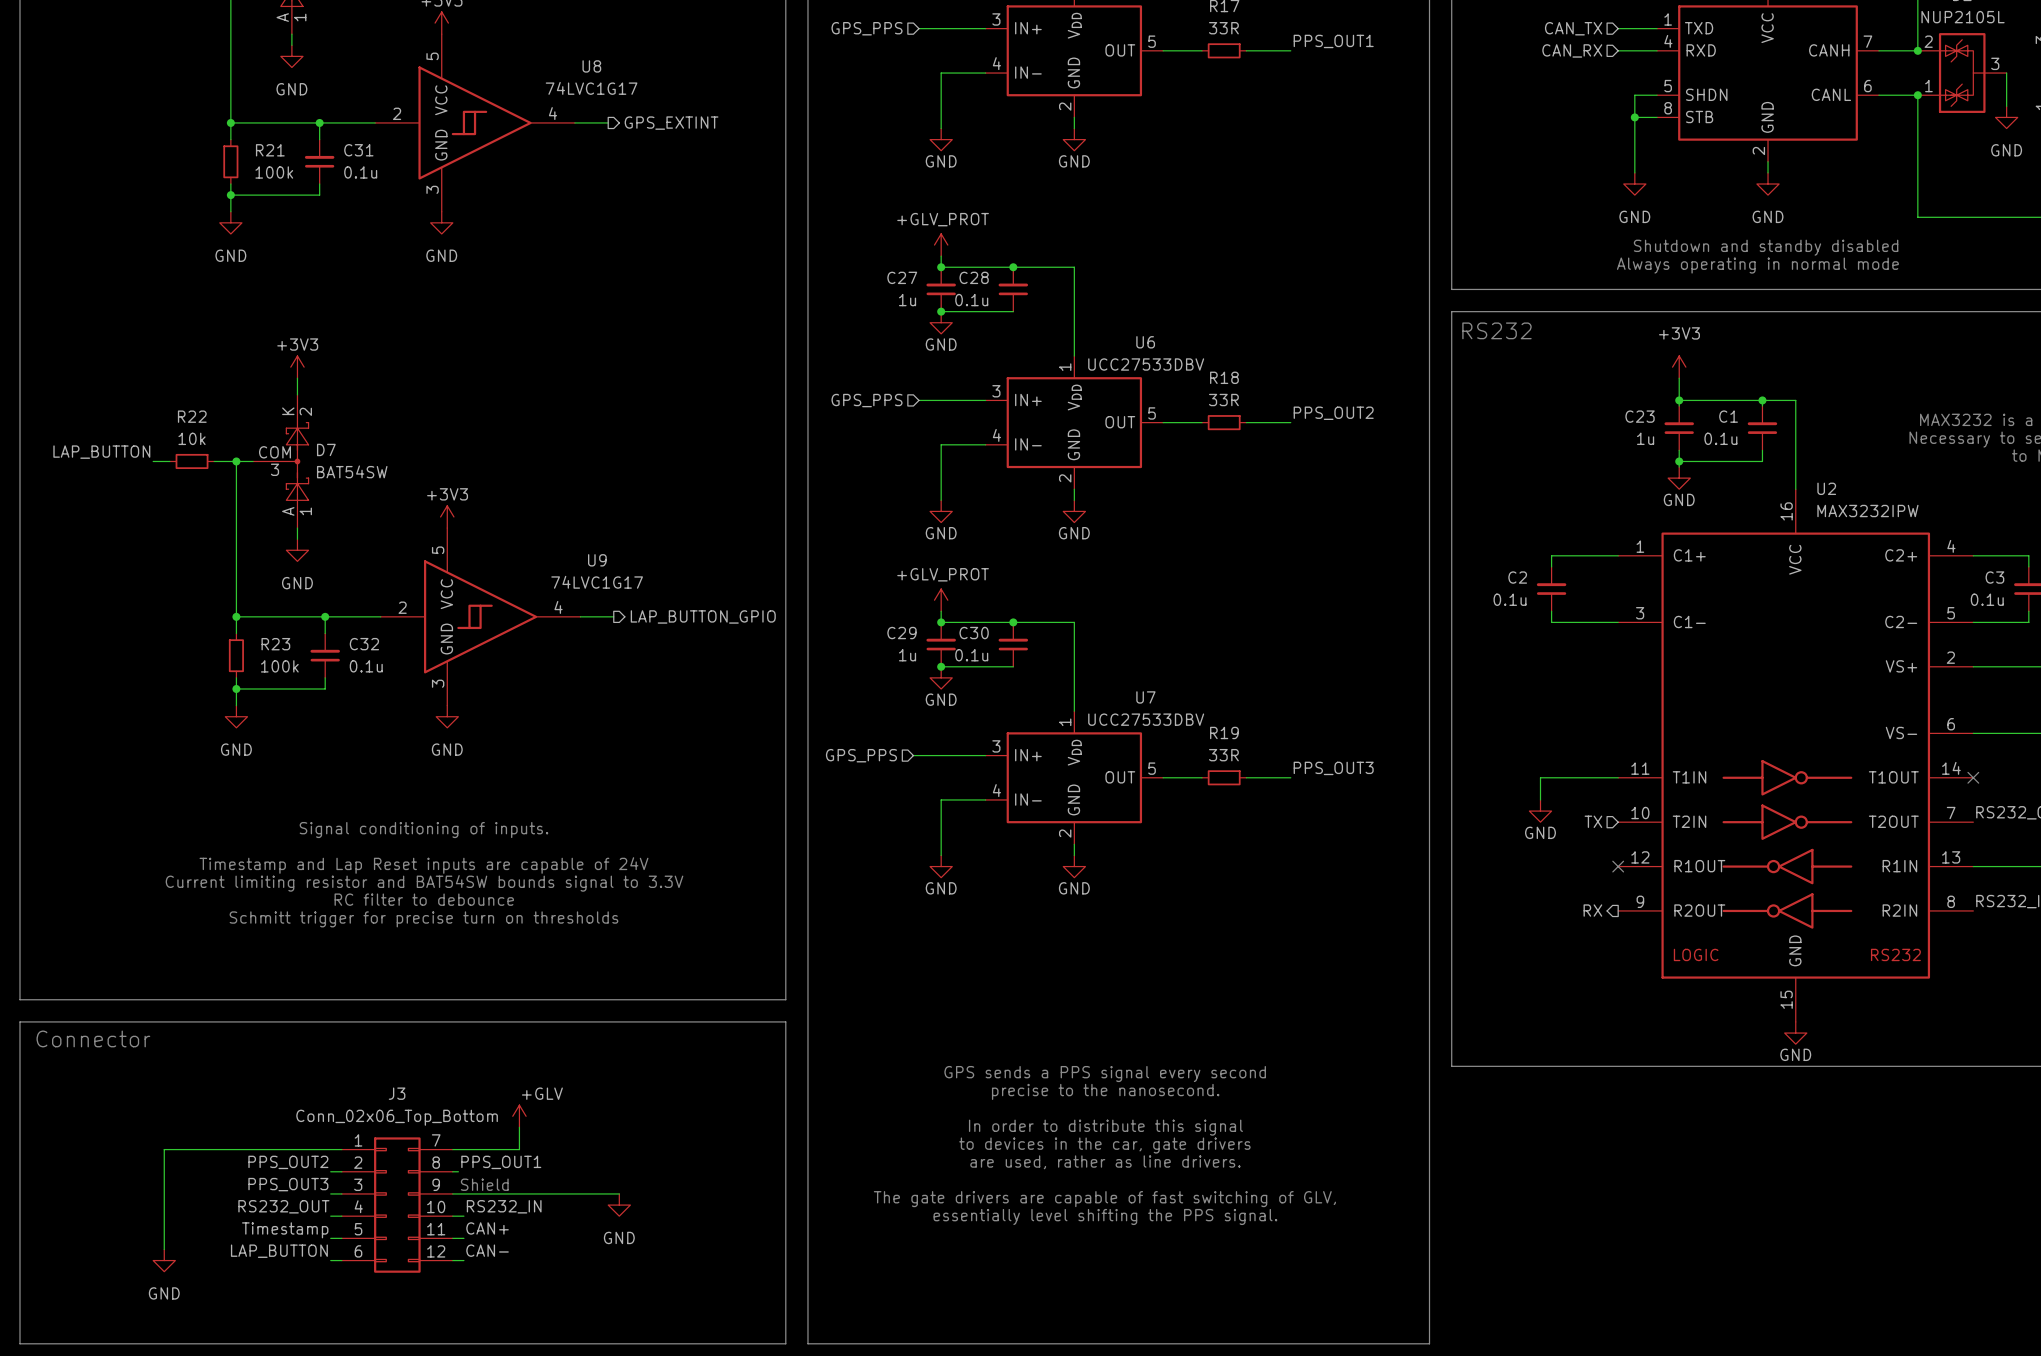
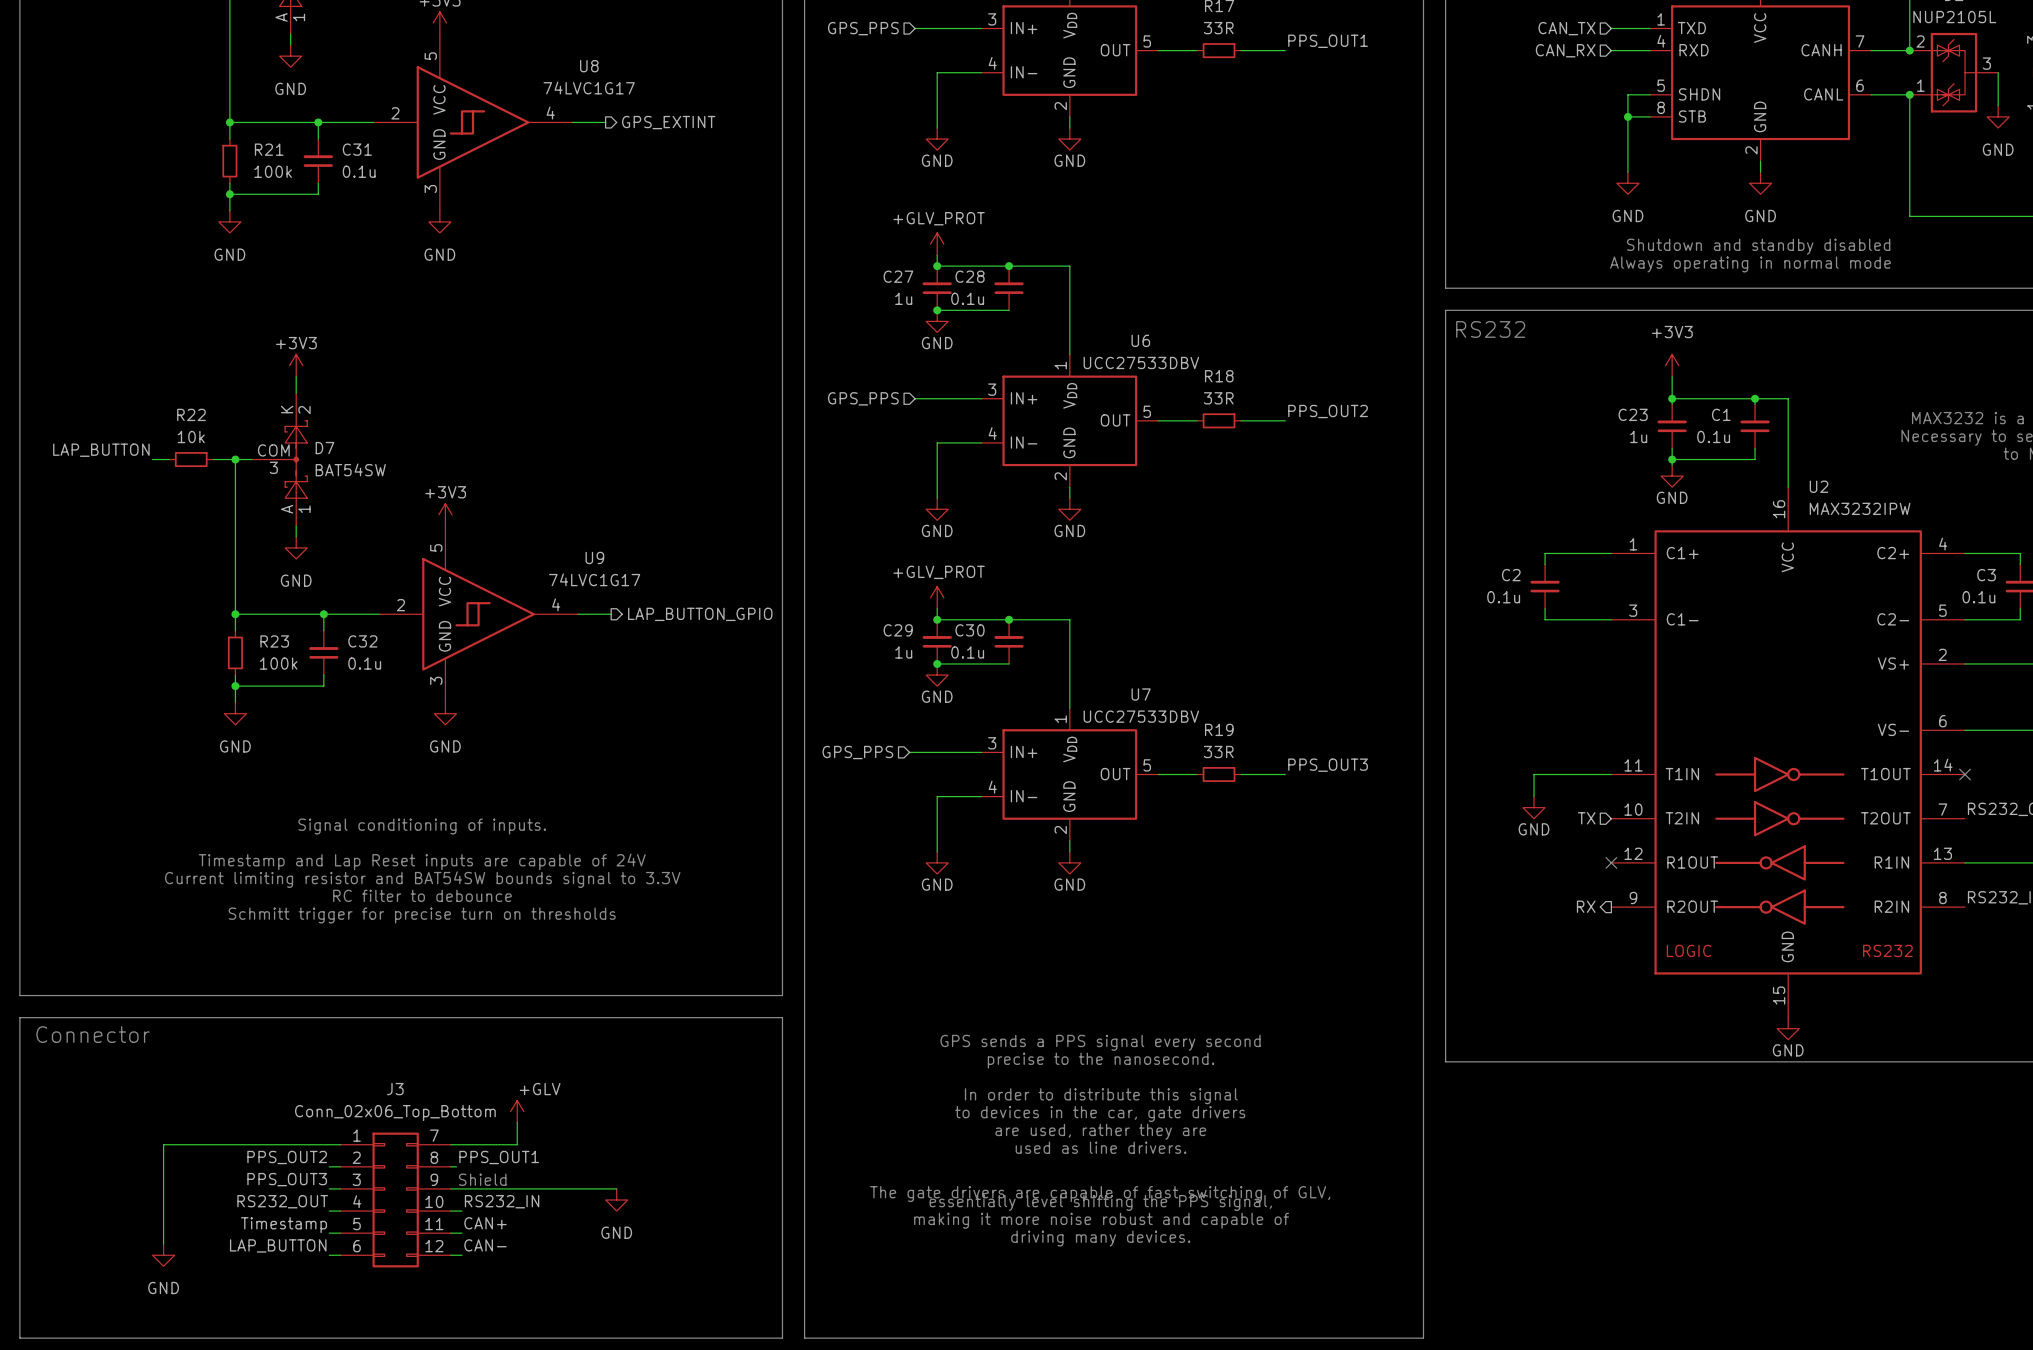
text position: GPS sends a PPS signal every second (1105, 1074) -> GPS sends a PPS signal every second (1100, 1042)
text position: precise to the nanosecond. (1105, 1091) -> precise to the nanosecond. (1101, 1060)
text position: In order to distribute this signal (1105, 1127) -> In order to distribute this signal (1101, 1096)
text: none -> are used, rather they are (1100, 1131)
text position: to devices in the car, gate drivers (1104, 1145) -> to devices in the car, gate drivers (1100, 1113)
text: are used, rather as line drivers. (1105, 1162) -> used as line drivers. (1101, 1147)
text: essentially level shifting the PPS signal. (1105, 1216) -> essentially level shifting the PPS signal, (1100, 1202)
text: none -> making it more noise robust and capable of (1101, 1220)
text: none -> driving many devices. (1100, 1238)

